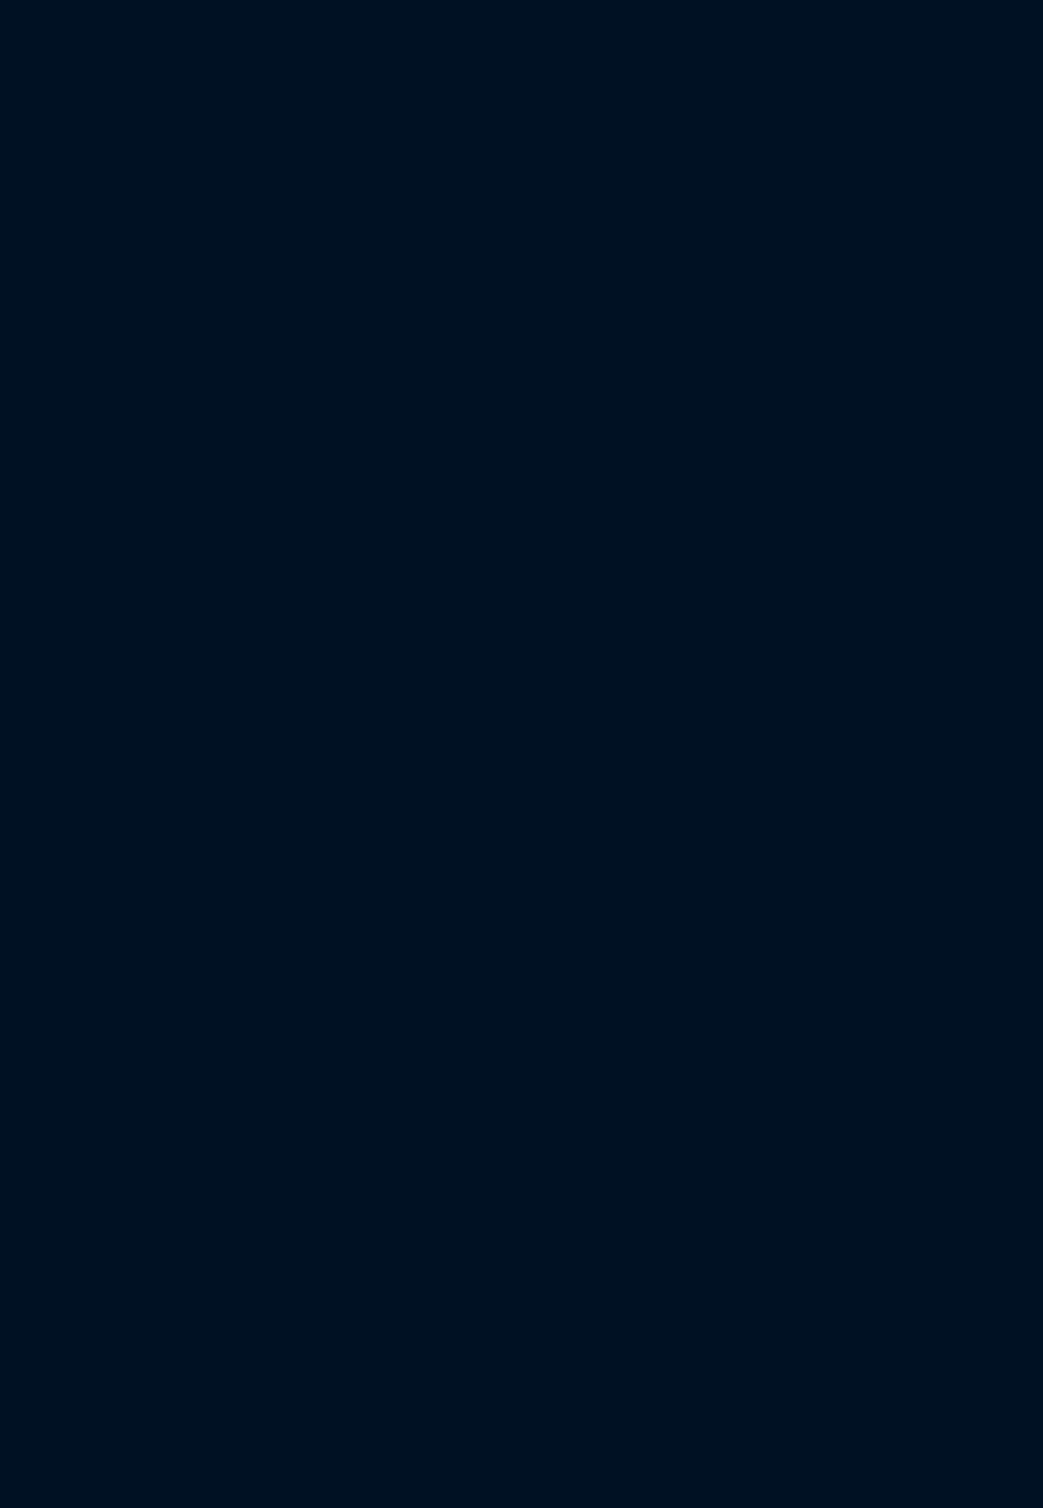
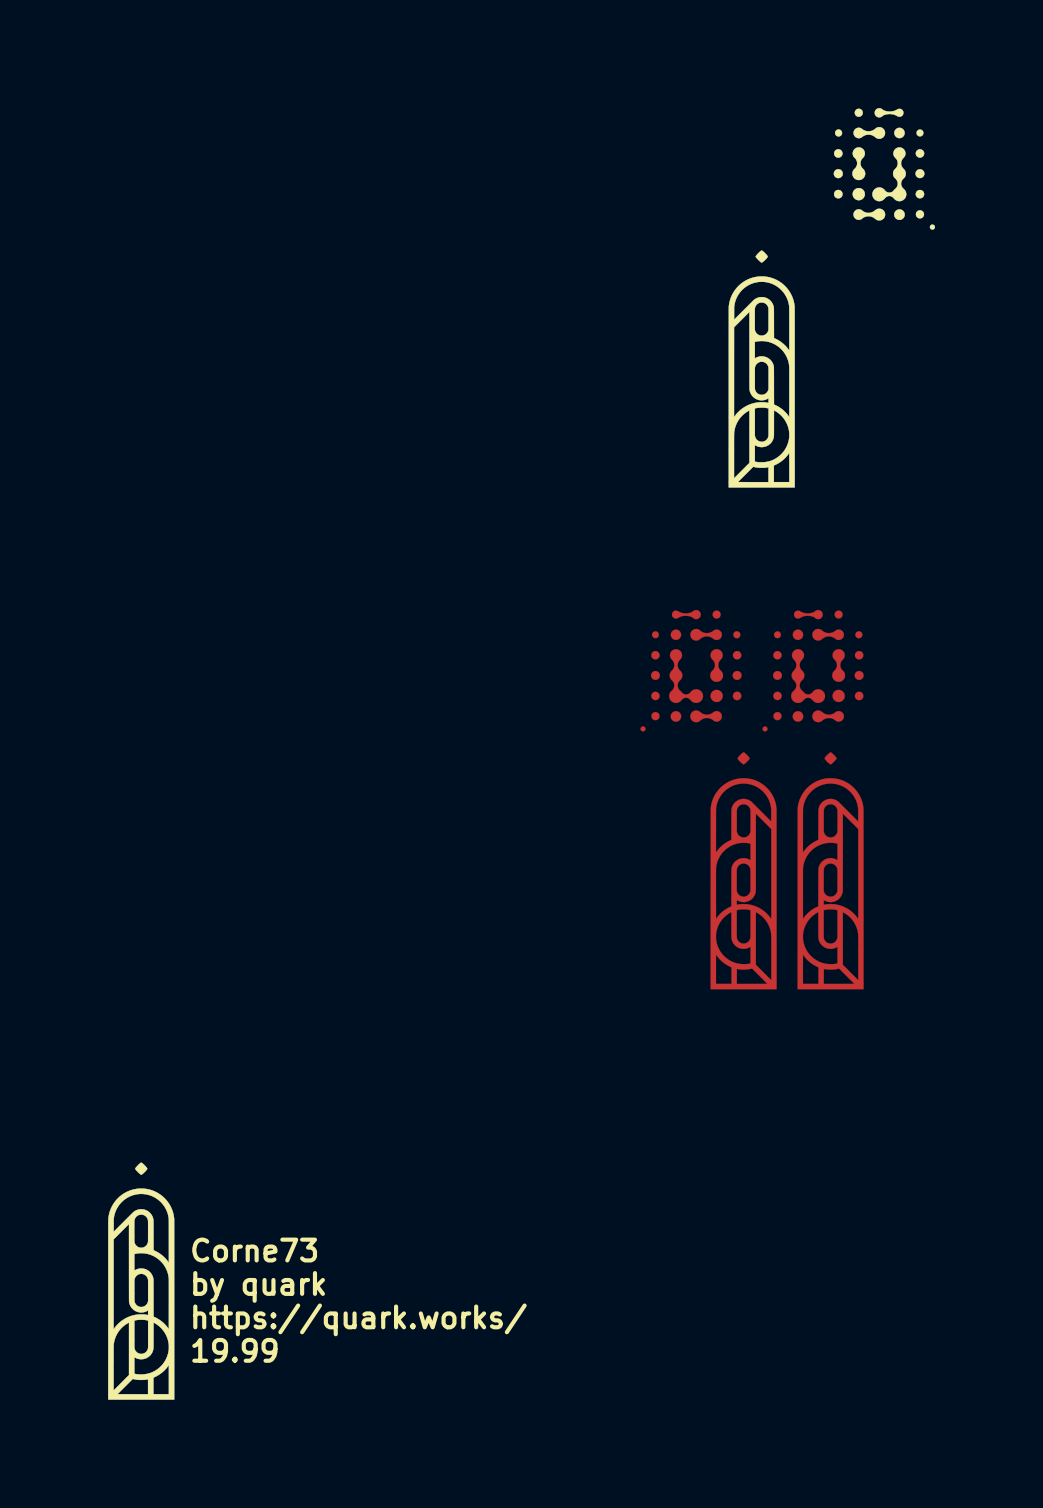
drawing: none -> [833, 108, 935, 230]
drawing: none -> [728, 250, 795, 488]
drawing: none -> [640, 609, 864, 990]
drawing: none -> [108, 1162, 175, 1400]
text: none -> Corne73 (254, 1250)
text: none -> by quark (259, 1286)
text: none -> https://quark.works/ (359, 1319)
text: none -> 19.99 (234, 1350)

